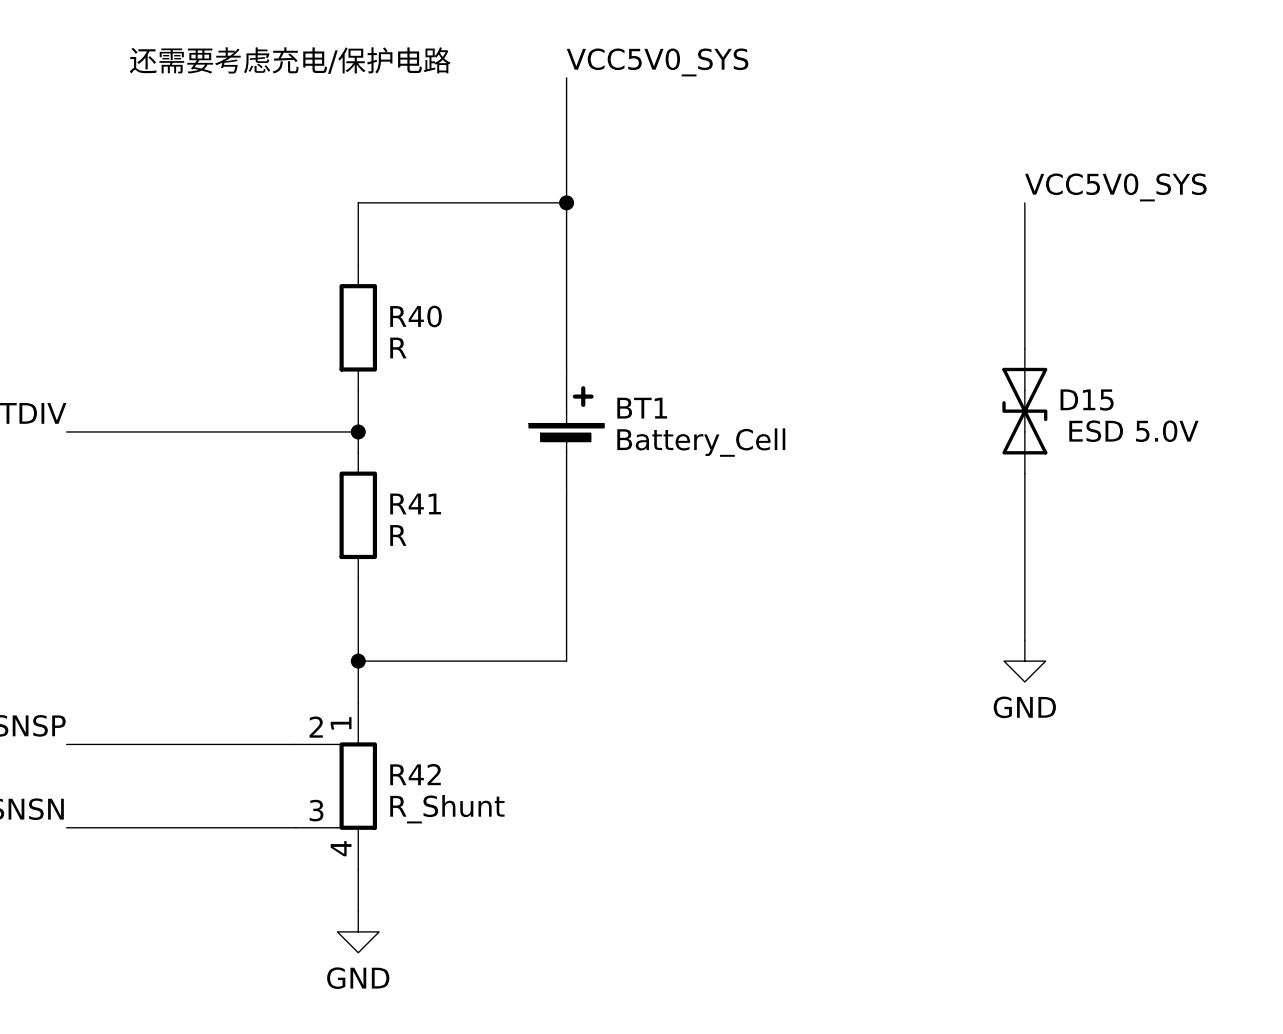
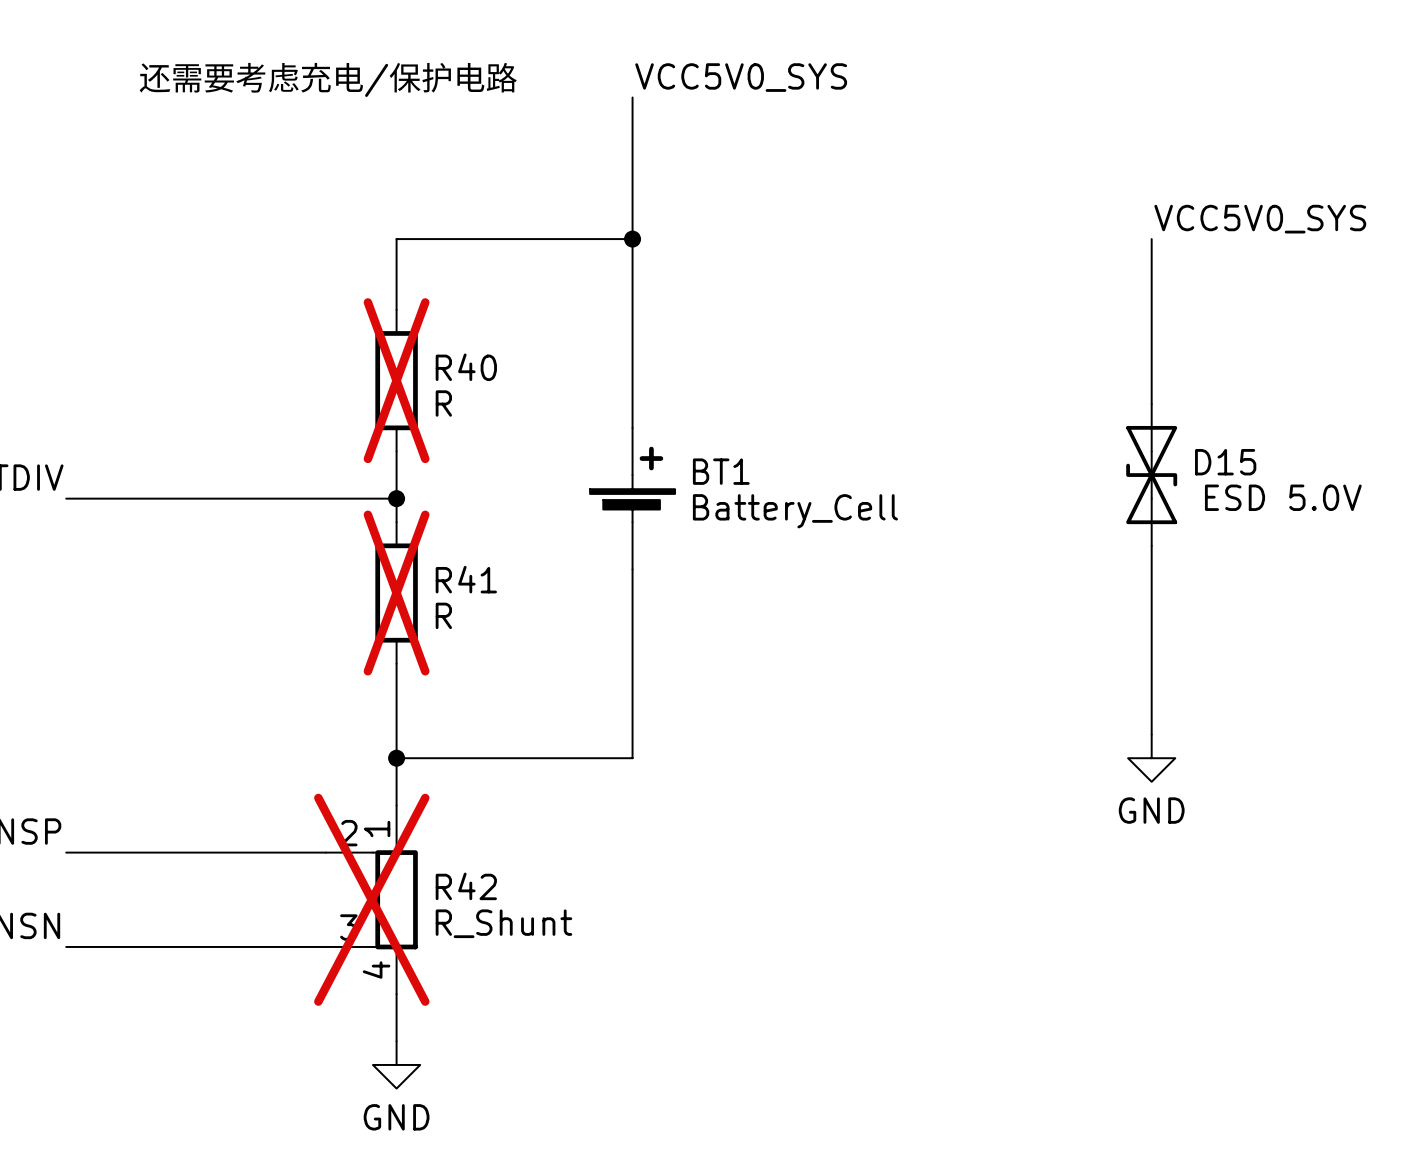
R40 do-not-place cross: none -> (396, 380)
R41 do-not-place cross: none -> (396, 593)
R42 do-not-place cross: none -> (371, 899)

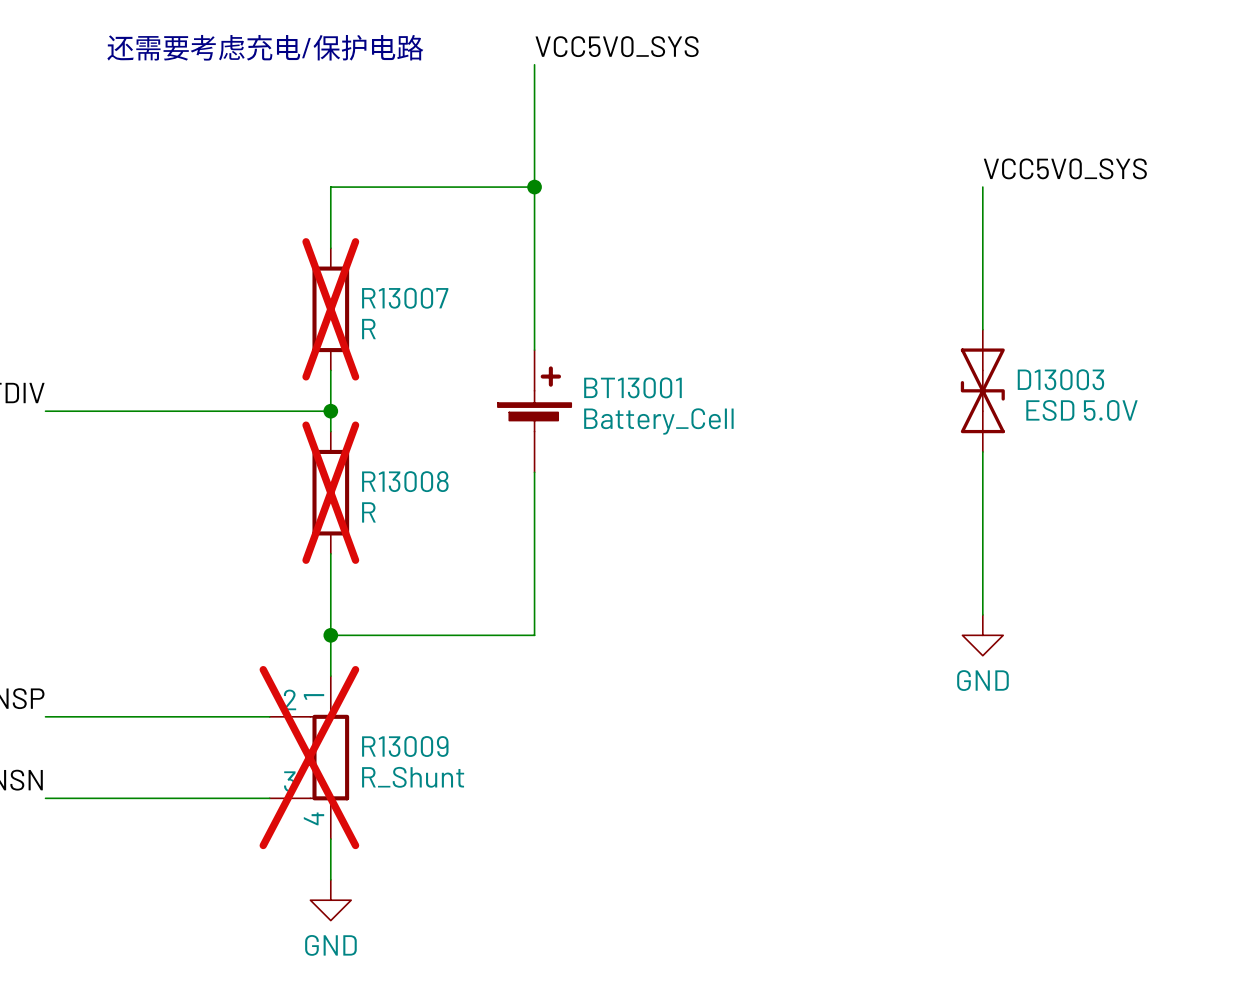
R40 name: R40 (466, 367) -> R13007 (405, 298)
D15 name: D15 (1225, 462) -> D13003 (1060, 379)
BT1 name: BT1 (721, 471) -> BT13001 (632, 387)
R41 name: R41 (466, 579) -> R13008 (405, 481)
R42 name: R42 (466, 886) -> R13009 (405, 746)

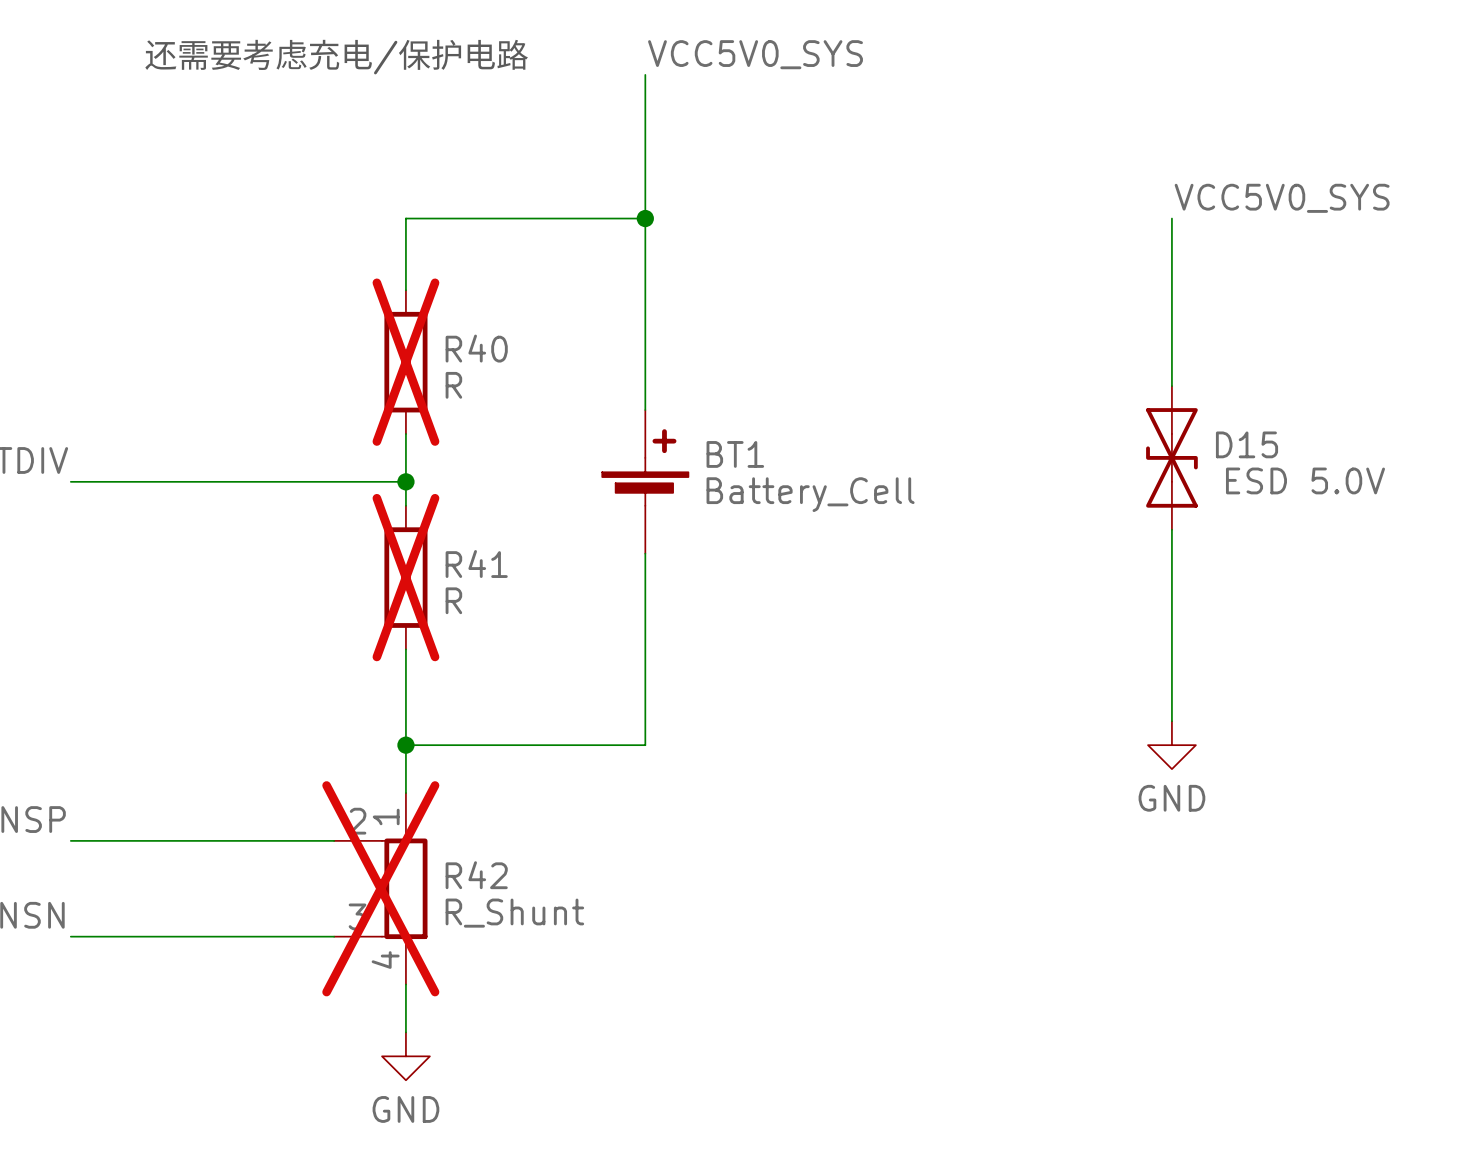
R13007 name: R13007 (405, 298) -> R40 (476, 348)
D13003 name: D13003 (1060, 379) -> D15 (1246, 444)
BT13001 name: BT13001 (632, 387) -> BT1 (735, 454)
R13008 name: R13008 (405, 481) -> R41 (476, 564)
R13009 name: R13009 (405, 746) -> R42 (476, 875)

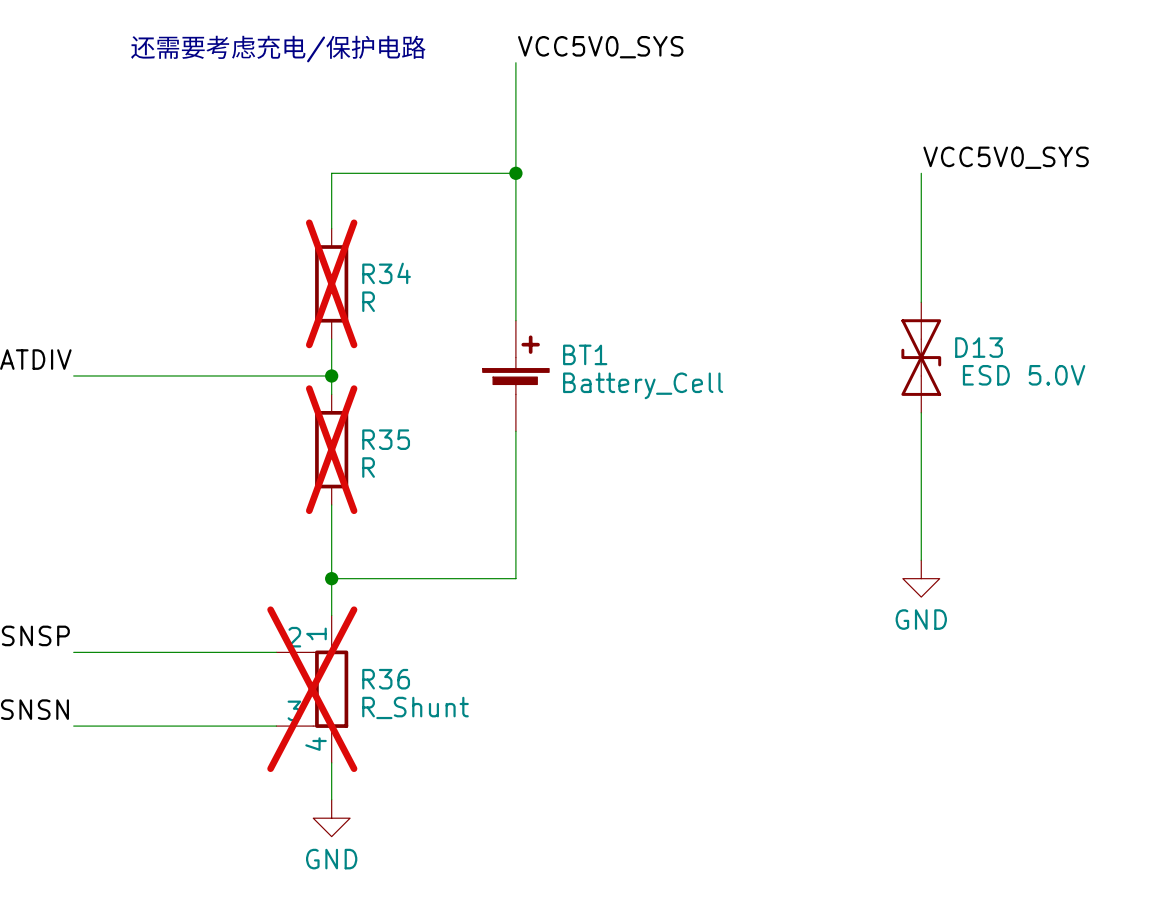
R40 name: R40 (476, 348) -> R34 (386, 273)
D15 name: D15 (1246, 444) -> D13 (979, 347)
R41 name: R41 (476, 564) -> R35 (386, 439)
R42 name: R42 (476, 875) -> R36 (386, 679)

